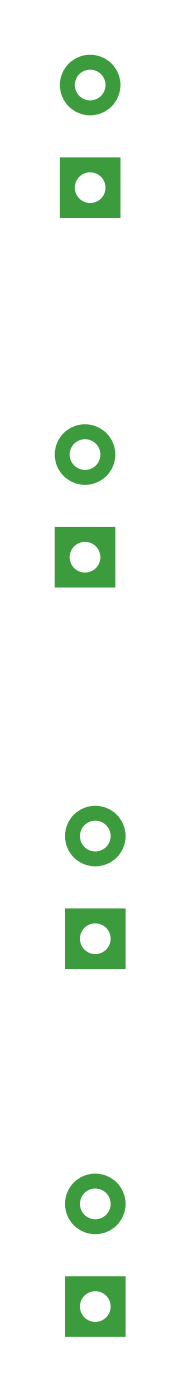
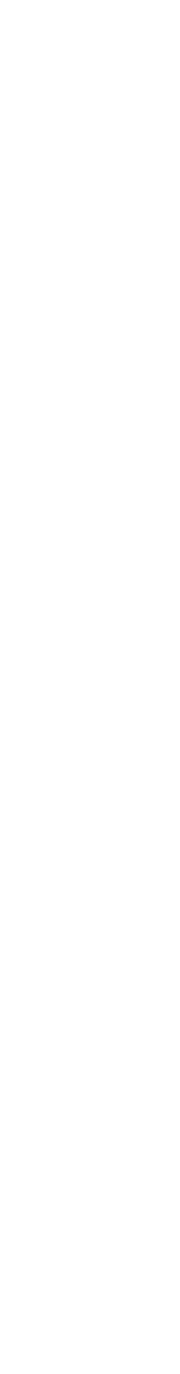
part: (90, 136) -> none
part: (85, 505) -> none
part: (95, 887) -> none
part: (95, 1255) -> none

